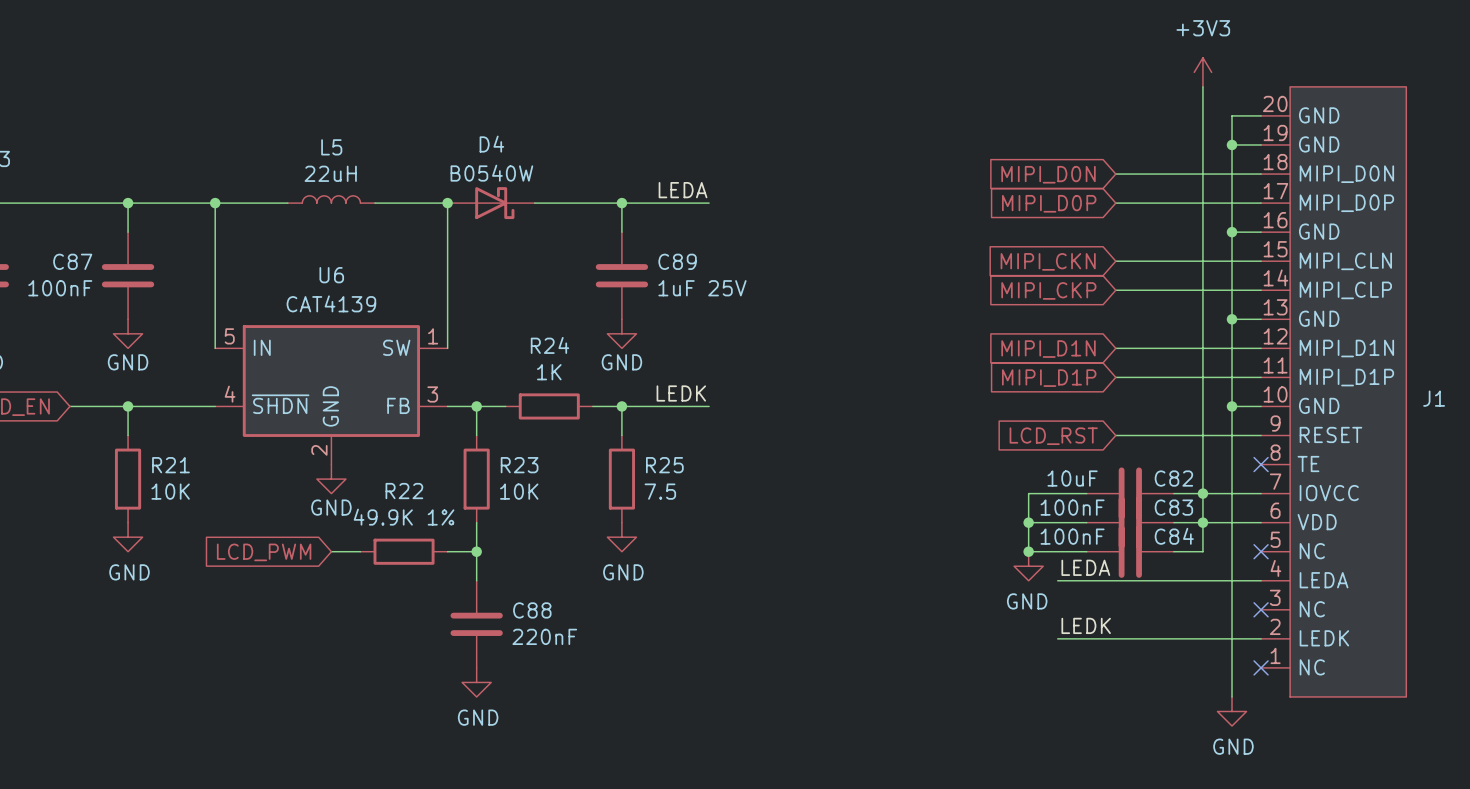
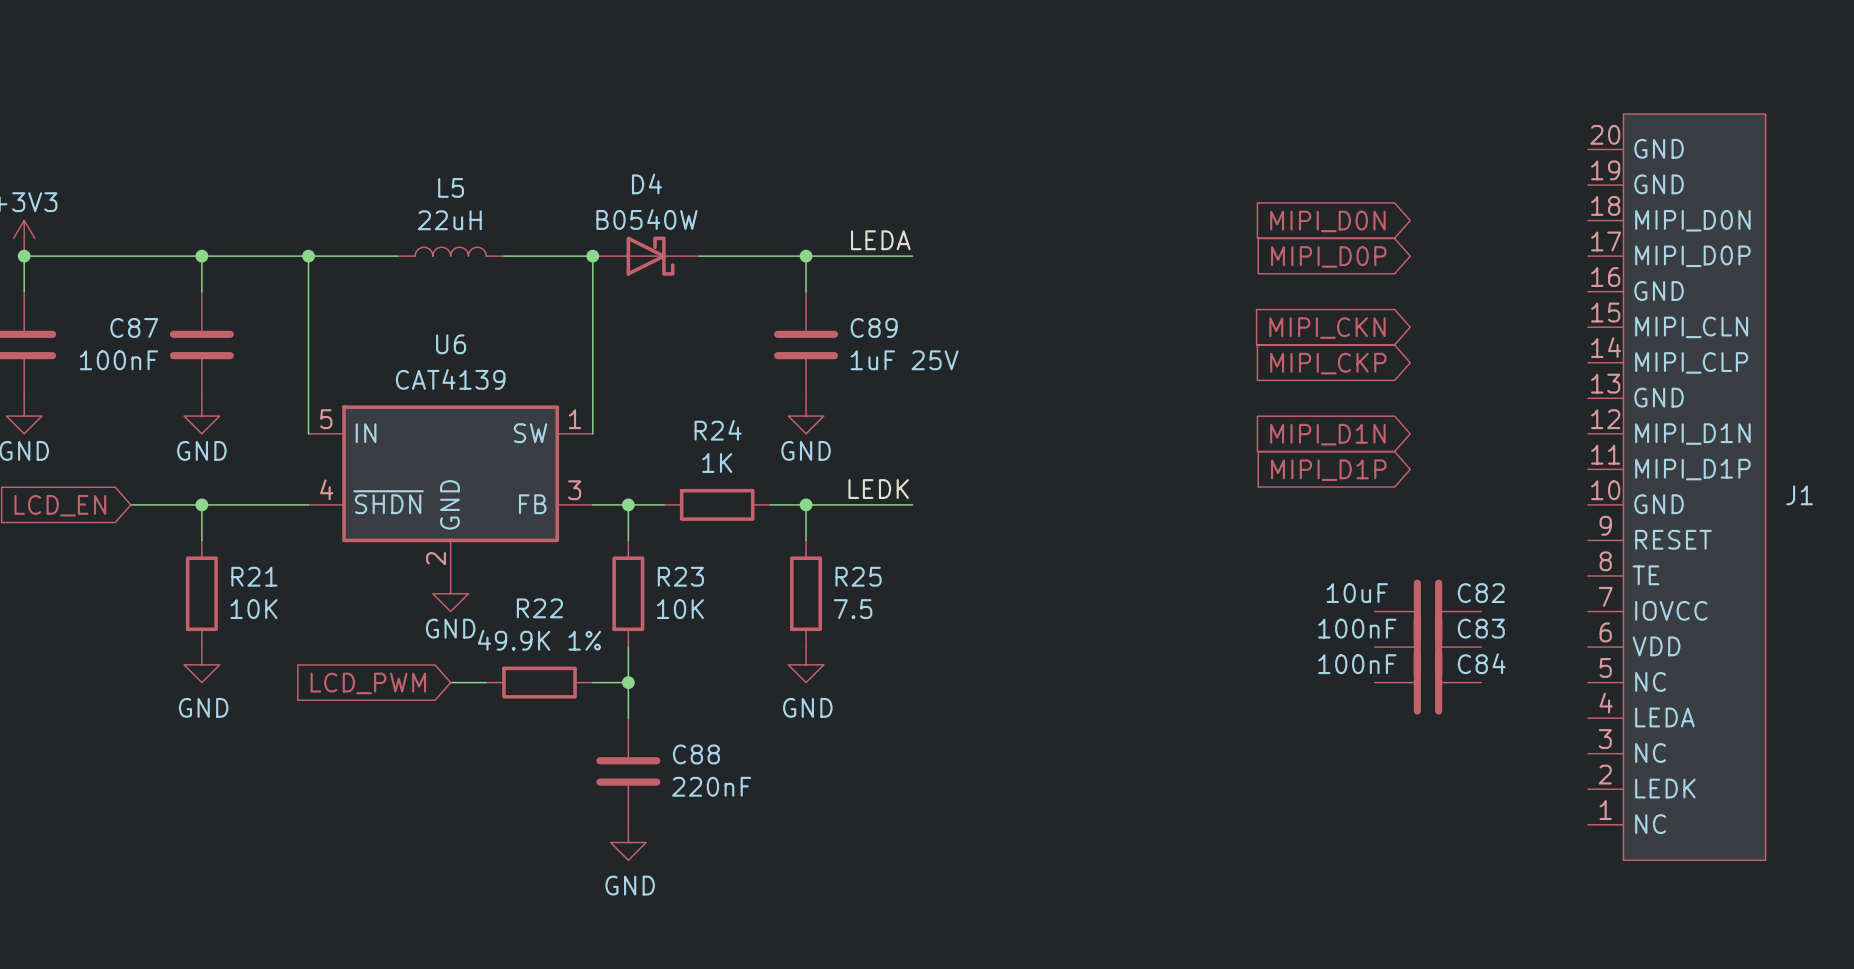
power symbol: +3V3 (1202, 72) -> none
wire: (1202, 86) (1202, 551) (1173, 551) -> none
wire: (1261, 115) (1232, 115) (1232, 696) -> none
wire: (1232, 144) (1261, 144) -> none
junction: (1232, 144) -> none
wire: (1115, 174) (1261, 174) -> none
wire: (1115, 203) (1261, 203) -> none
wire: (1232, 232) (1261, 232) -> none
junction: (1232, 232) -> none
wire: (1115, 261) (1261, 261) -> none
wire: (1115, 290) (1261, 290) -> none
wire: (1232, 319) (1261, 319) -> none
junction: (1232, 319) -> none
wire: (1115, 348) (1261, 348) -> none
wire: (1115, 377) (1261, 377) -> none
wire: (1232, 406) (1261, 406) -> none
junction: (1232, 406) -> none
wire: (1115, 435) (1261, 435) -> none
global label: LCD_RST (1053, 436) -> none
no-connect mark: (1261, 464) -> none
wire: (1086, 493) (1028, 493) (1028, 551) (1086, 551) -> none
wire: (1173, 493) (1261, 493) -> none
junction: (1202, 493) -> none
wire: (1028, 522) (1086, 522) -> none
junction: (1028, 522) -> none
wire: (1173, 522) (1261, 522) -> none
junction: (1202, 522) -> none
junction: (1028, 551) -> none
no-connect mark: (1261, 551) -> none
power symbol: GND (1028, 566) -> none
label: LEDA (1085, 567) -> none
wire: (1057, 580) (1261, 580) -> none
no-connect mark: (1261, 609) -> none
label: LEDK (1086, 625) -> none
wire: (1057, 638) (1261, 638) -> none
no-connect mark: (1261, 667) -> none
power symbol: GND (1232, 711) -> none

